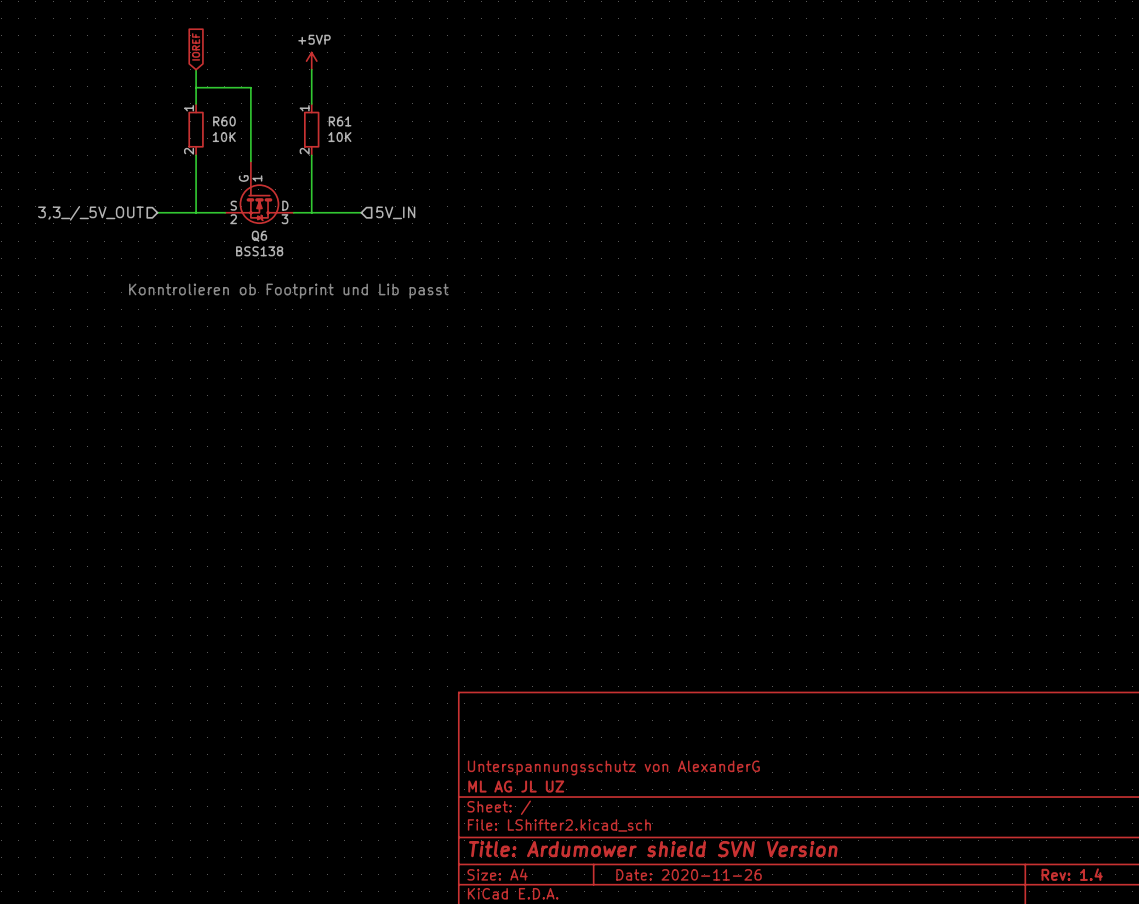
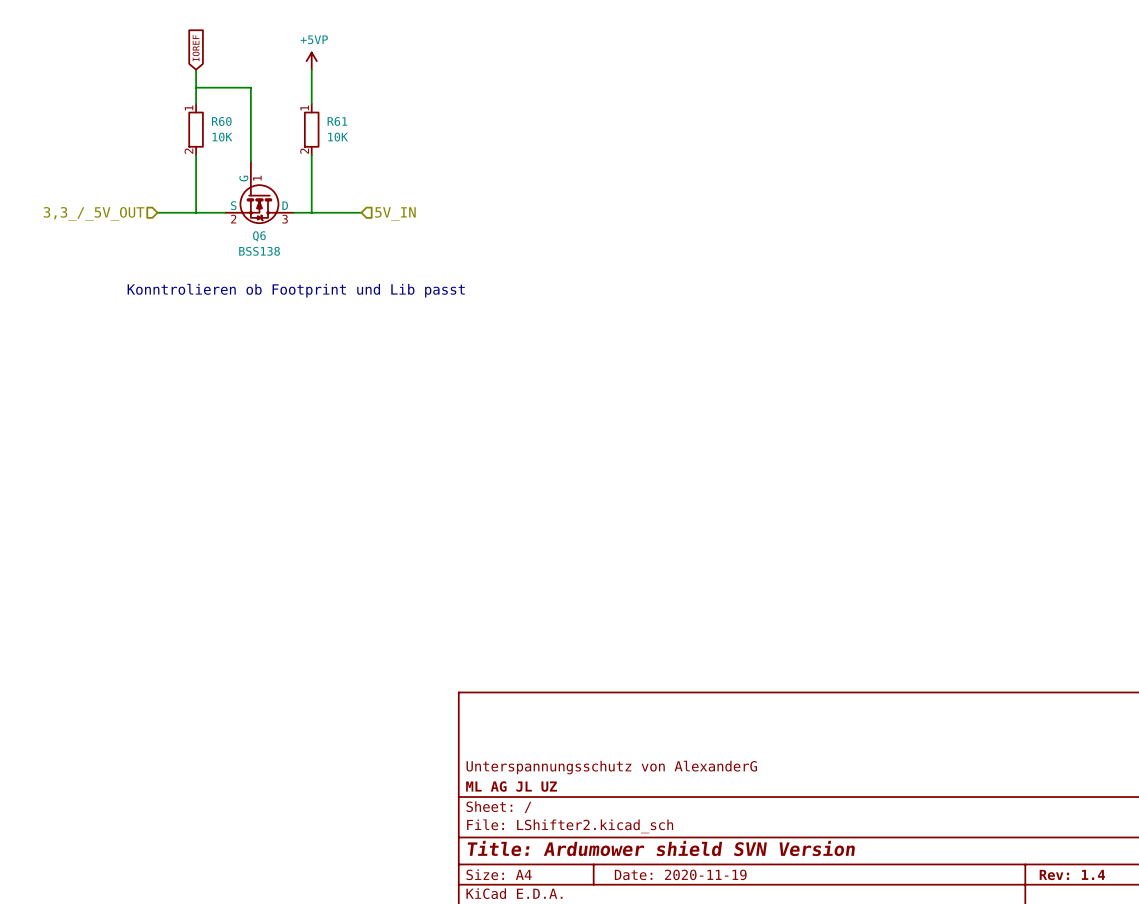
title block: Date: 2020-11-26 (689, 874) -> Date: 2020-11-19 (680, 874)

